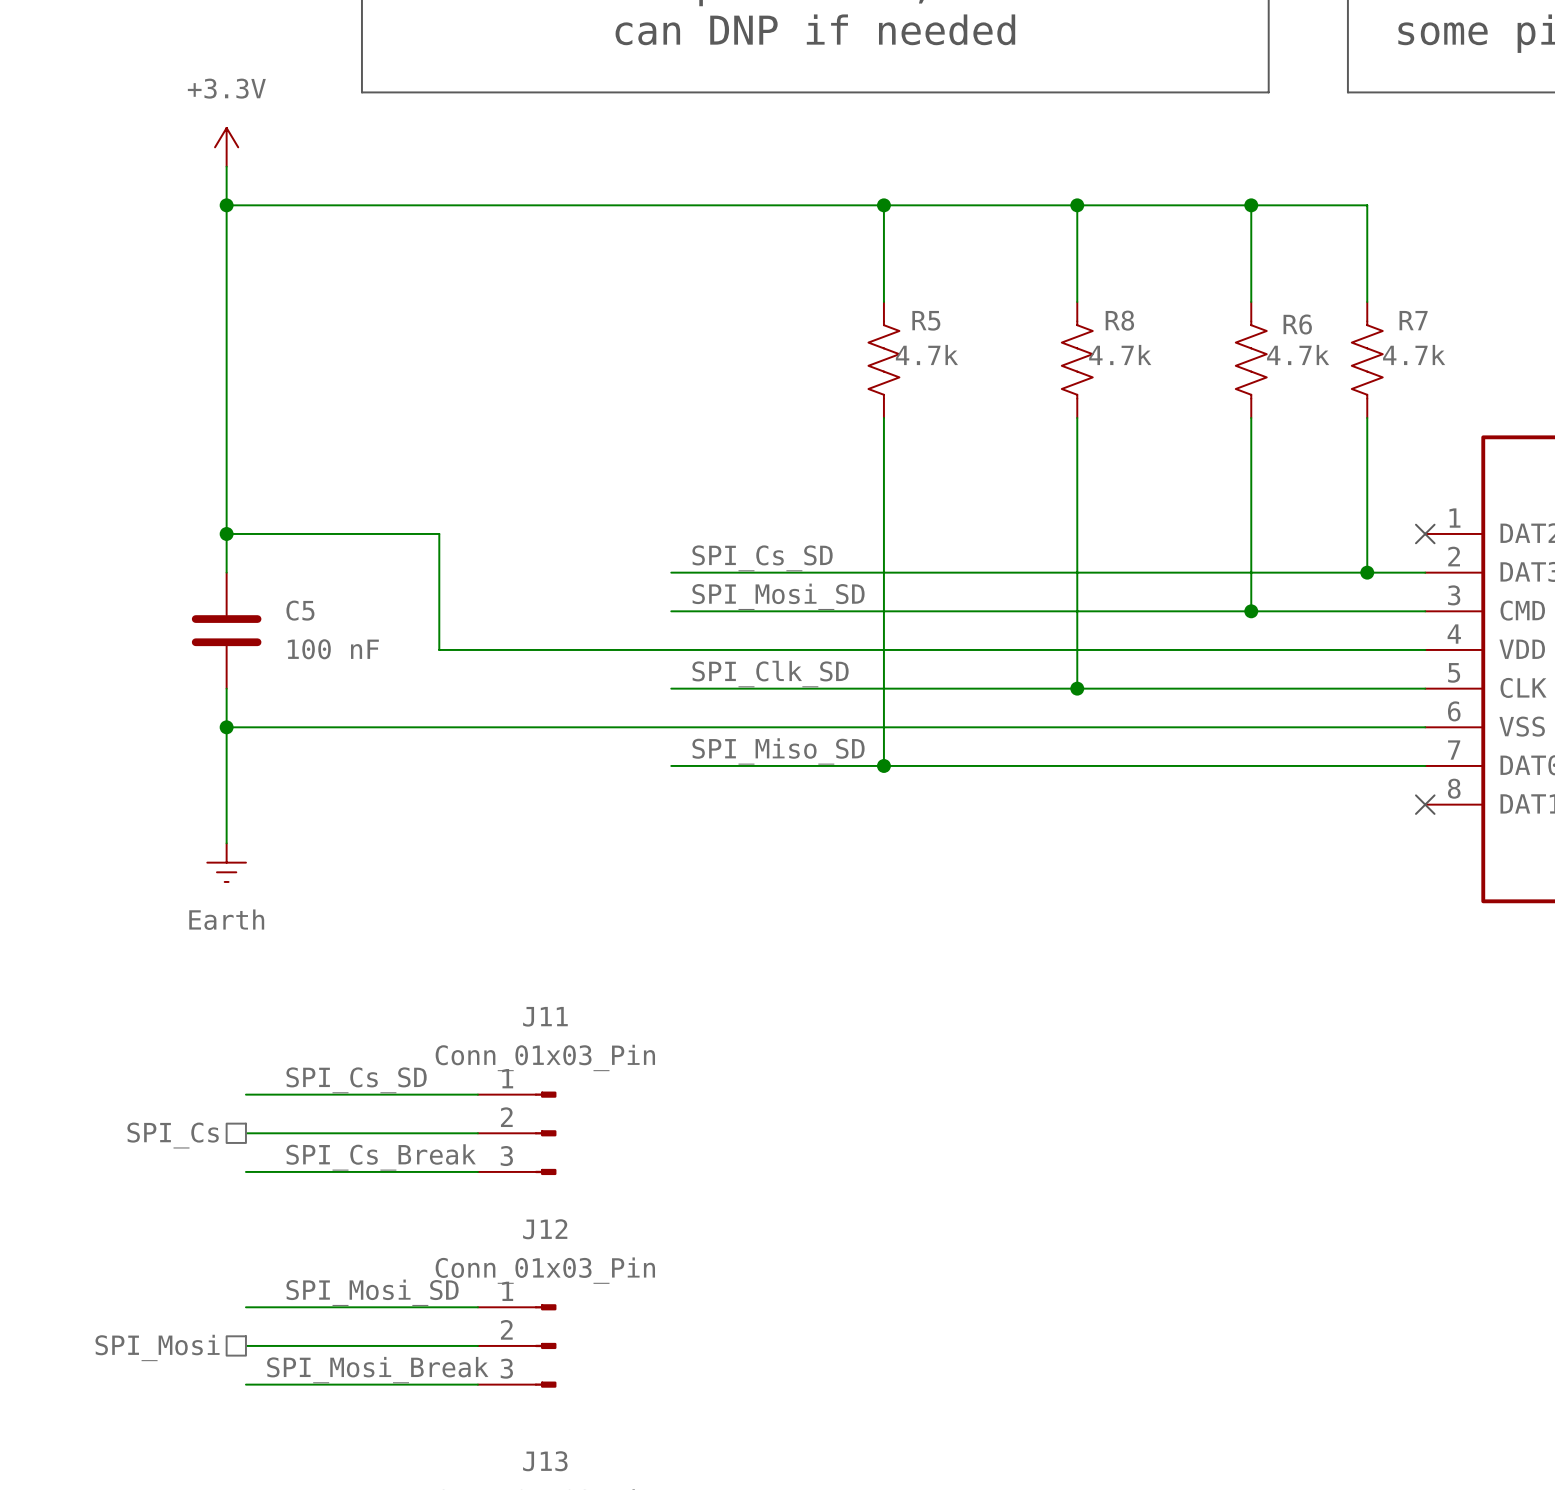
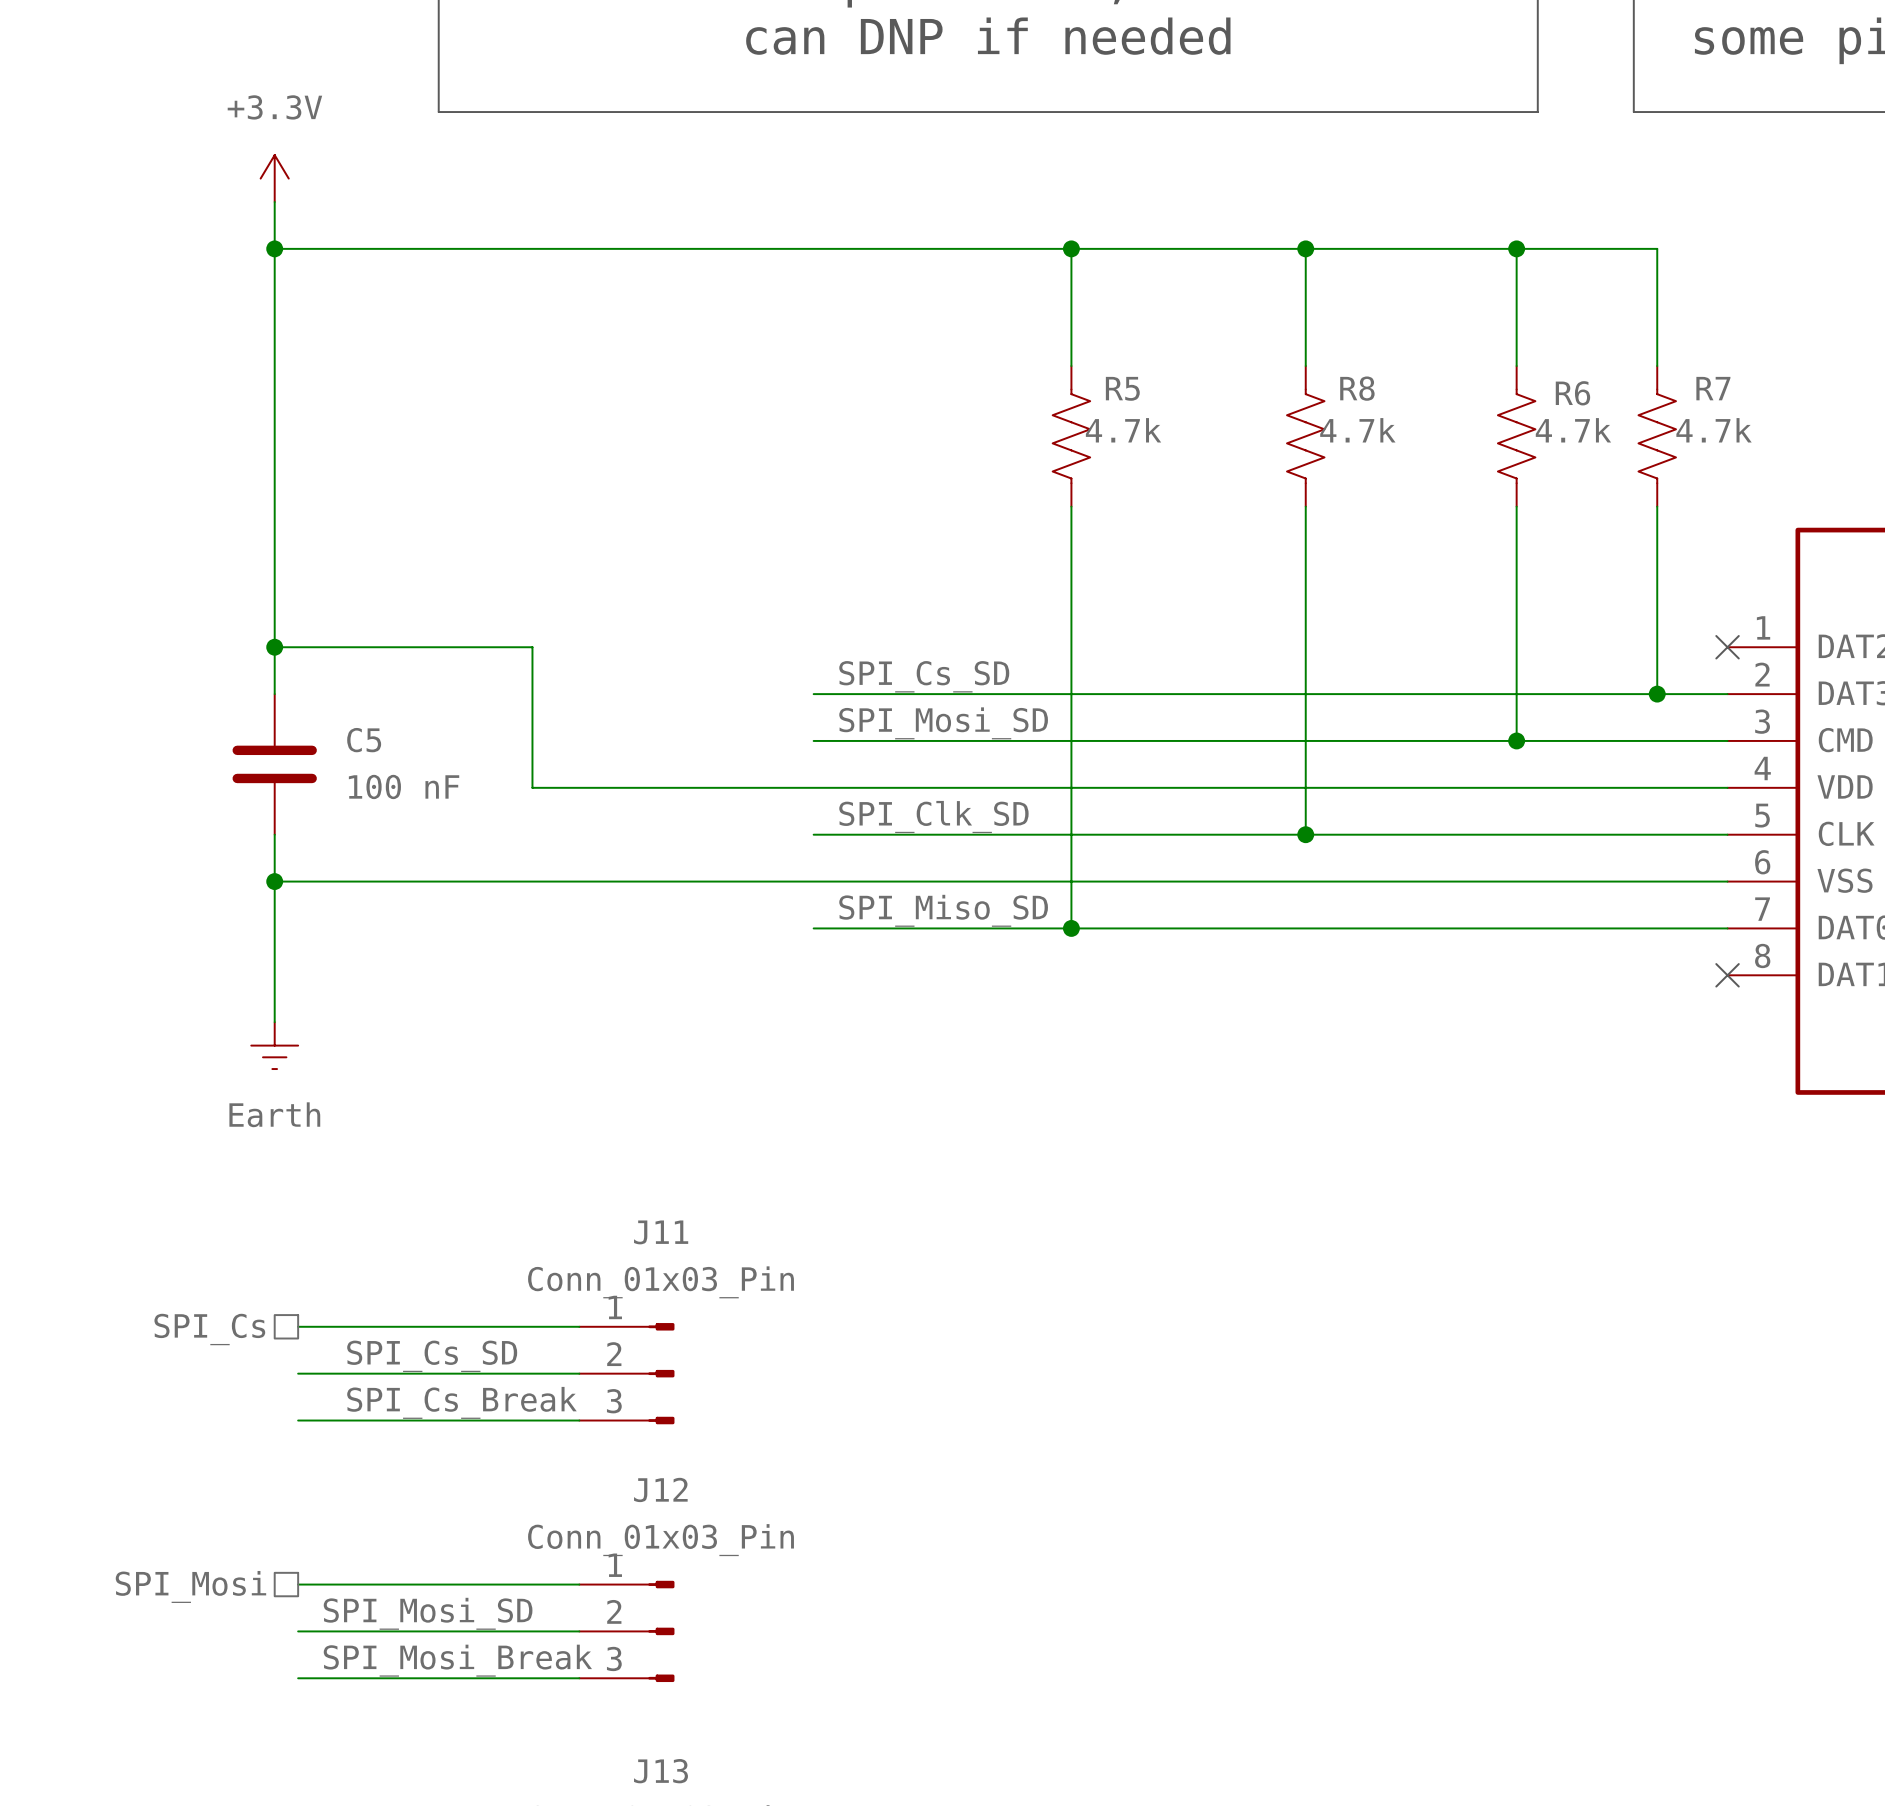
label position: SPI_Cs_SD (356, 1080) -> SPI_Cs_SD (432, 1356)
hierarchical label position: SPI_Cs (173, 1135) -> SPI_Cs (209, 1329)
label position: SPI_Mosi_SD (372, 1292) -> SPI_Mosi_SD (428, 1613)
hierarchical label position: SPI_Mosi (157, 1347) -> SPI_Mosi (190, 1586)

